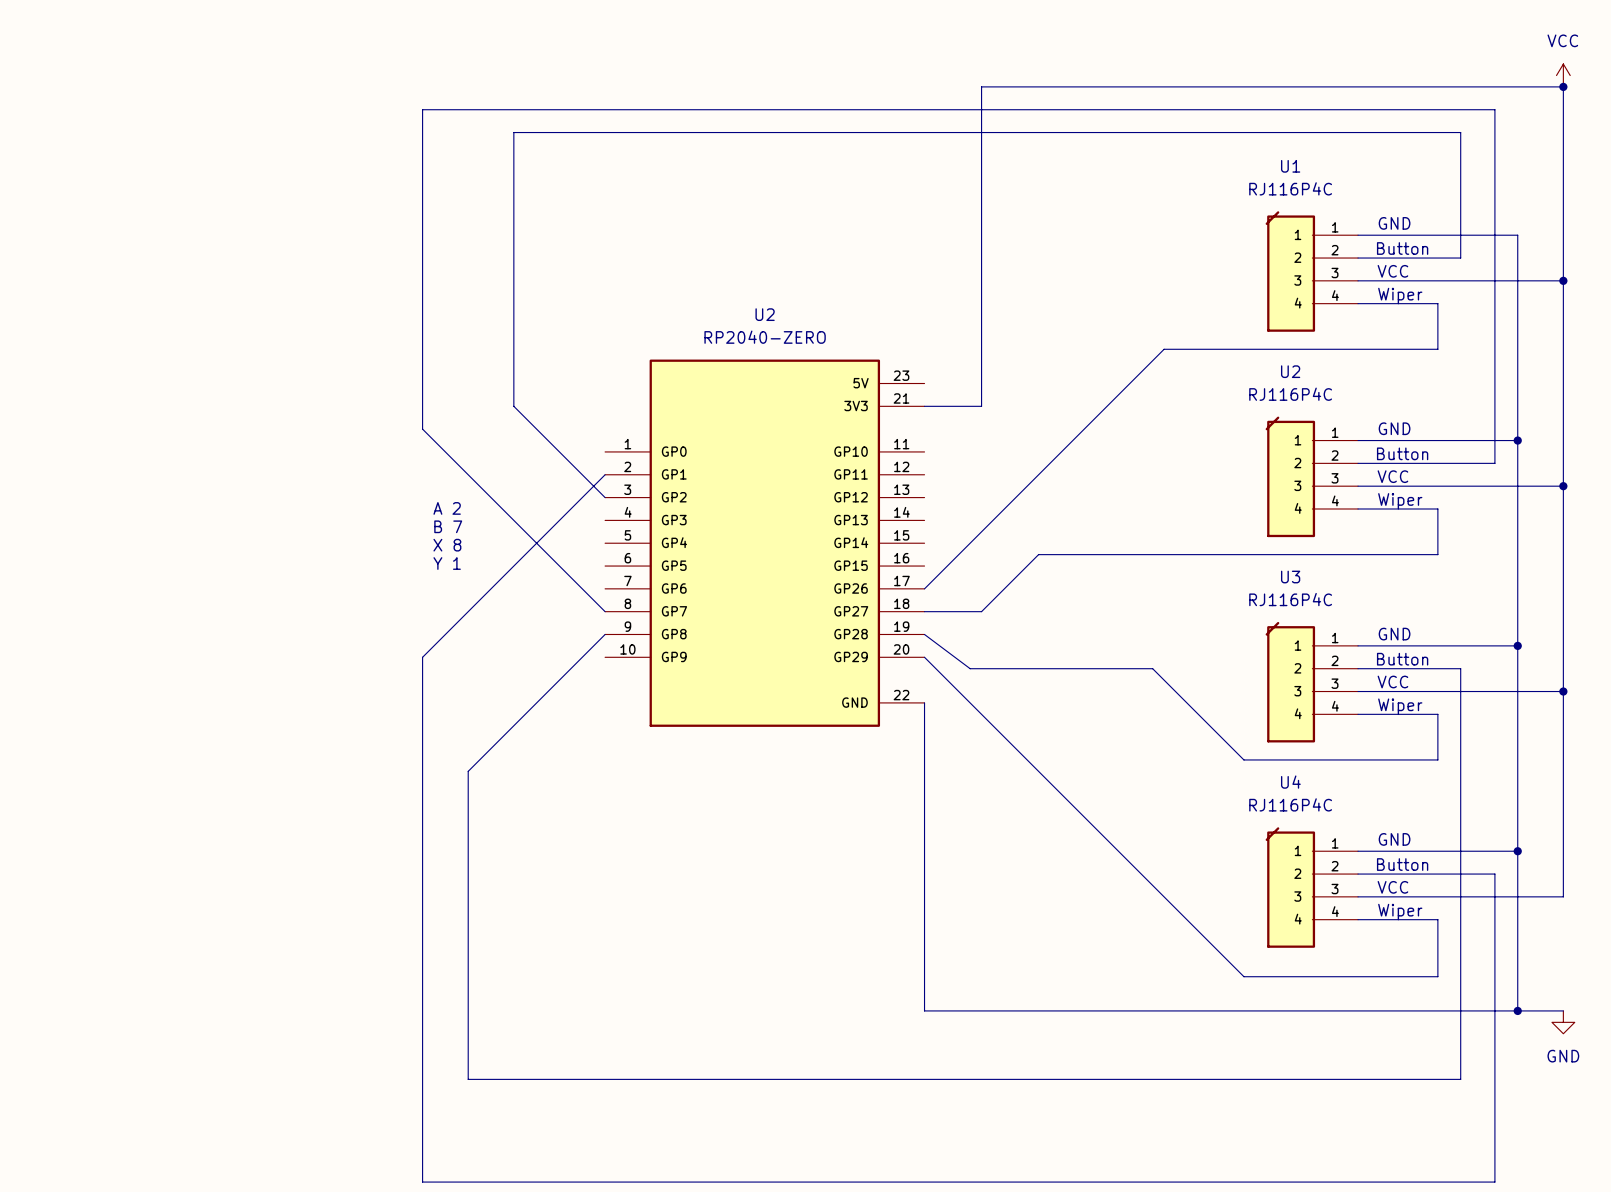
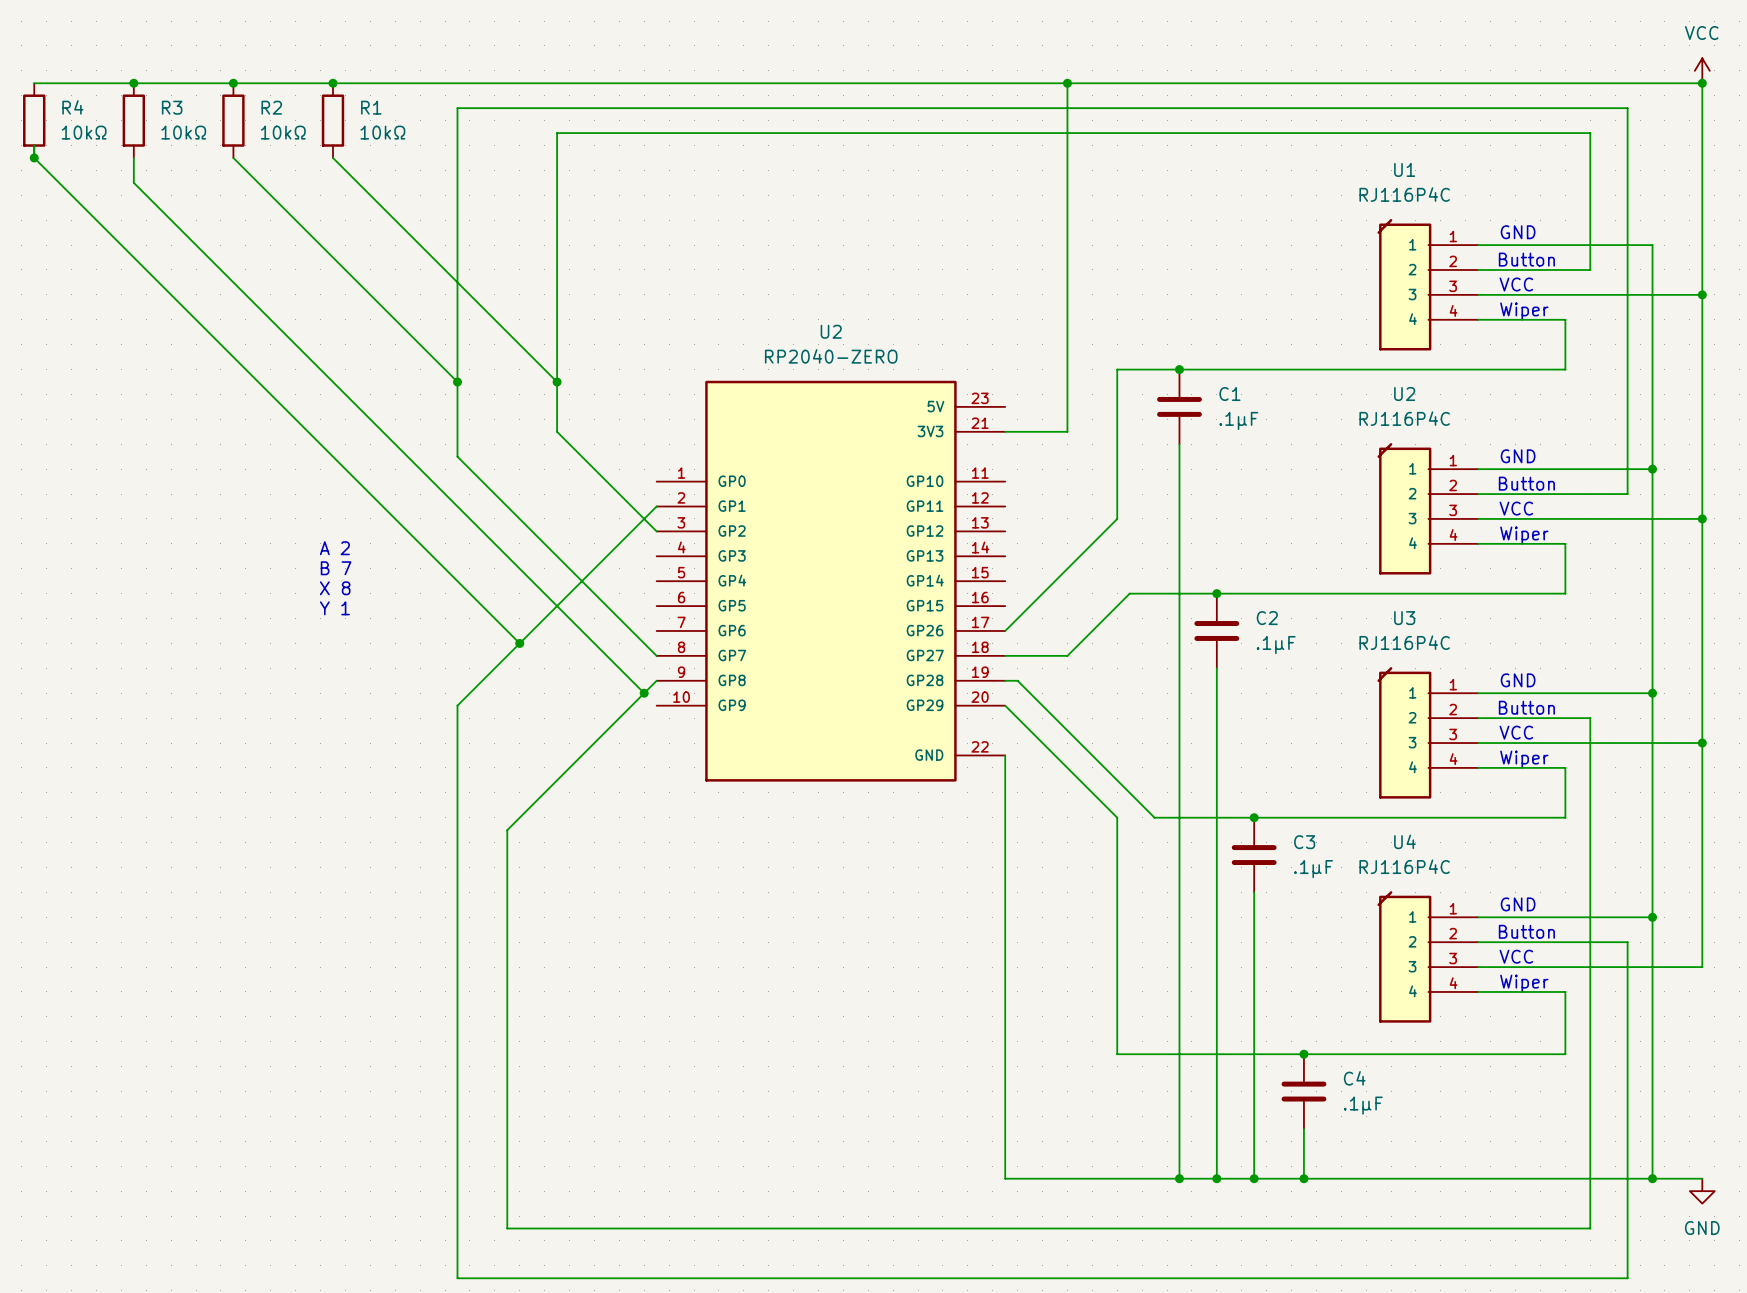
wire: none -> (34, 83) (1067, 83)
junction: none -> (133, 83)
junction: none -> (233, 83)
junction: none -> (333, 83)
junction: none -> (1067, 83)
R4: none -> 10kΩ (34, 120)
R3: none -> 10kΩ (133, 120)
R2: none -> 10kΩ (233, 120)
R1: none -> 10kΩ (333, 120)
wire: none -> (34, 145) (34, 157) (519, 643)
junction: none -> (34, 157)
wire: none -> (133, 157) (133, 182) (644, 693)
wire: none -> (233, 157) (457, 382)
wire: none -> (333, 157) (557, 382)
junction: none -> (1179, 369)
wire: (1164, 349) (1027, 486) -> (1266, 369) (1117, 369) (1117, 518)
junction: none -> (457, 382)
junction: none -> (557, 382)
C1: none -> .1µF (1179, 406)
wire: none -> (1179, 444) (1179, 1178)
text position: A 2 (447, 508) -> A 2 (334, 548)
text position: B 7 (448, 526) -> B 7 (336, 568)
text position: X 8 (447, 545) -> X 8 (335, 588)
junction: none -> (1216, 593)
text position: Y 1 (447, 563) -> Y 1 (334, 608)
C2: none -> .1µF (1216, 630)
junction: none -> (519, 643)
wire: none -> (1216, 668) (1216, 1178)
wire: (924, 634) (970, 668) (1152, 668) (1243, 759) -> (1005, 680) (1017, 680) (1154, 817) (1353, 817)
junction: none -> (644, 693)
wire: (1027, 759) (1243, 976) -> (1117, 817) (1117, 1054) (1353, 1054)
junction: none -> (1254, 817)
C3: none -> .1µF (1254, 855)
wire: none -> (1254, 892) (1254, 1178)
junction: none -> (1303, 1054)
wire: (924, 1010) (1563, 1010) -> (1005, 1091) (1005, 1178) (1702, 1178)
C4: none -> .1µF (1303, 1091)
wire: none -> (1652, 1091) (1652, 1178)
junction: (1517, 1010) -> none
power symbol position: GND (1563, 1022) -> GND (1702, 1191)
wire: none -> (1303, 1128) (1303, 1178)
wire: (468, 1079) (1460, 1079) -> (507, 1166) (507, 1228) (1590, 1228) (1590, 1166)
junction: none -> (1179, 1178)
junction: none -> (1216, 1178)
junction: none -> (1254, 1178)
junction: none -> (1303, 1178)
junction: none -> (1652, 1178)

